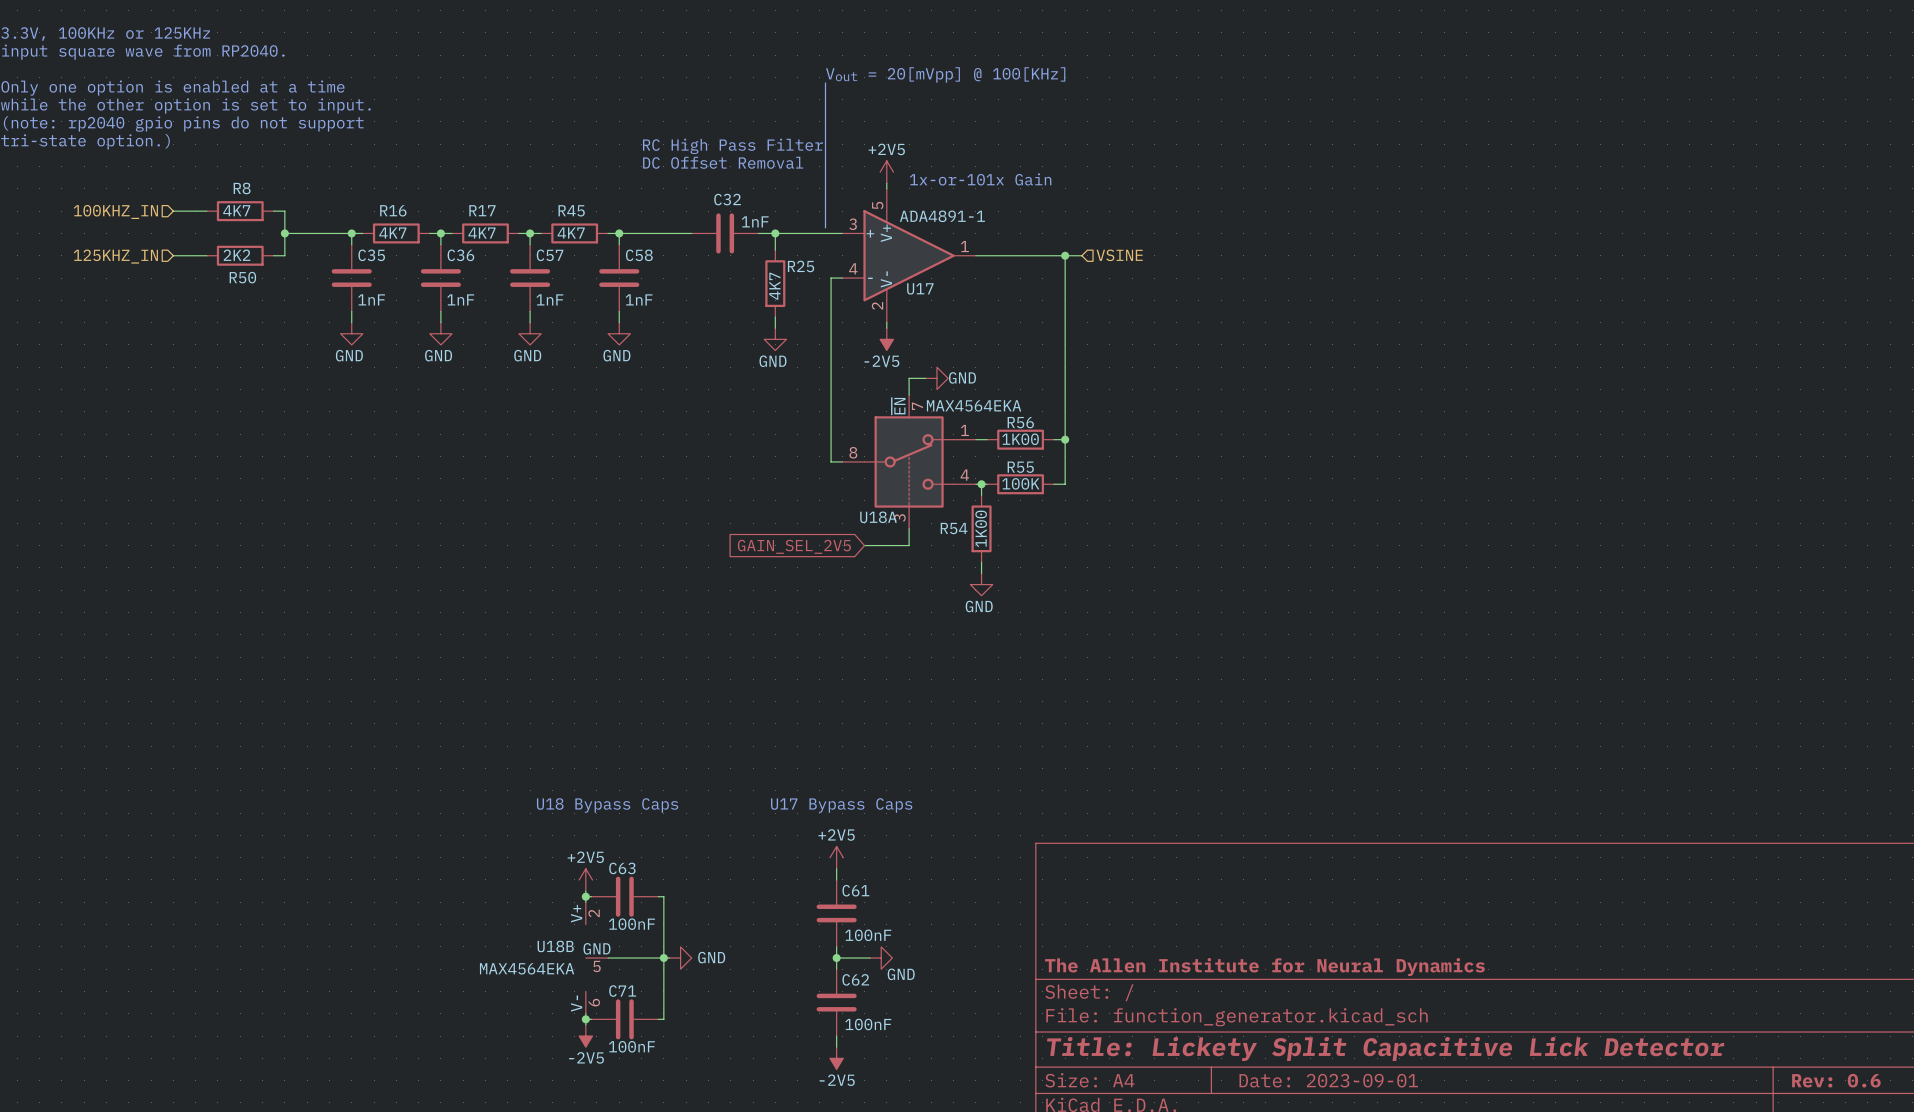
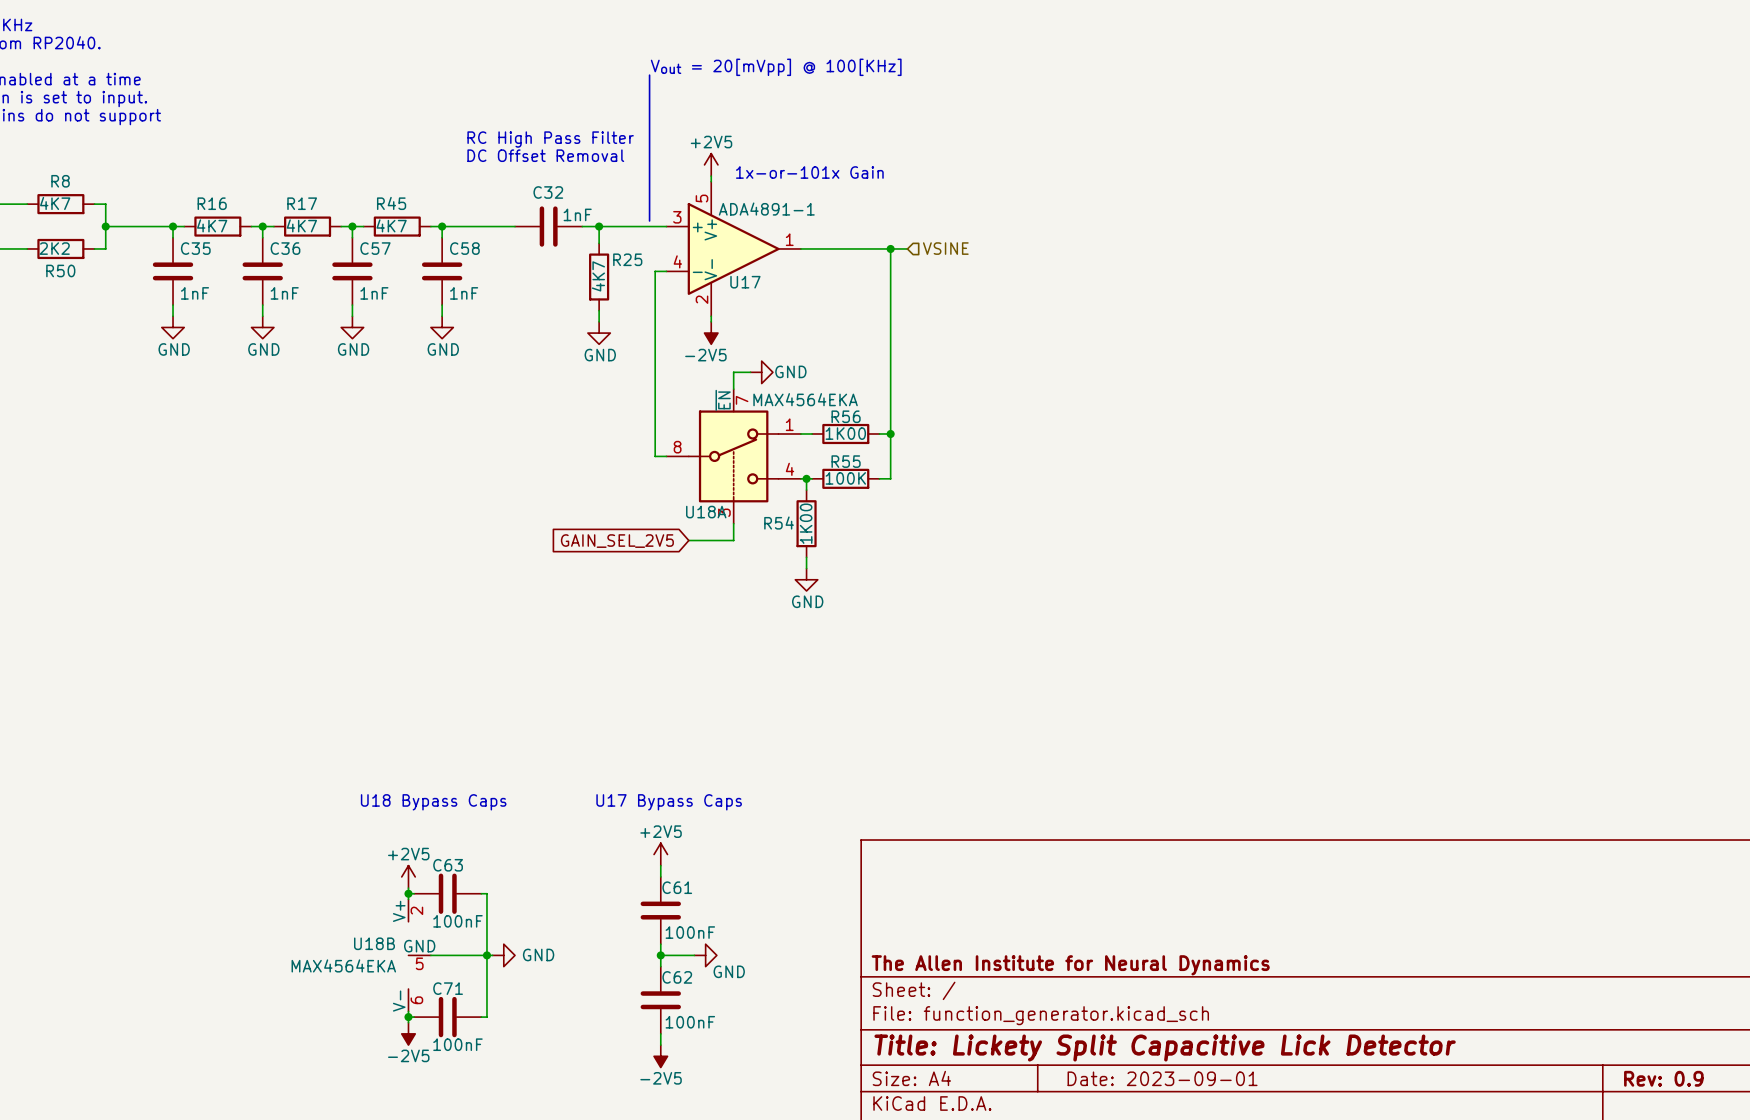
title block: Rev: 0.6 (1836, 1080) -> Rev: 0.9 (1663, 1078)

